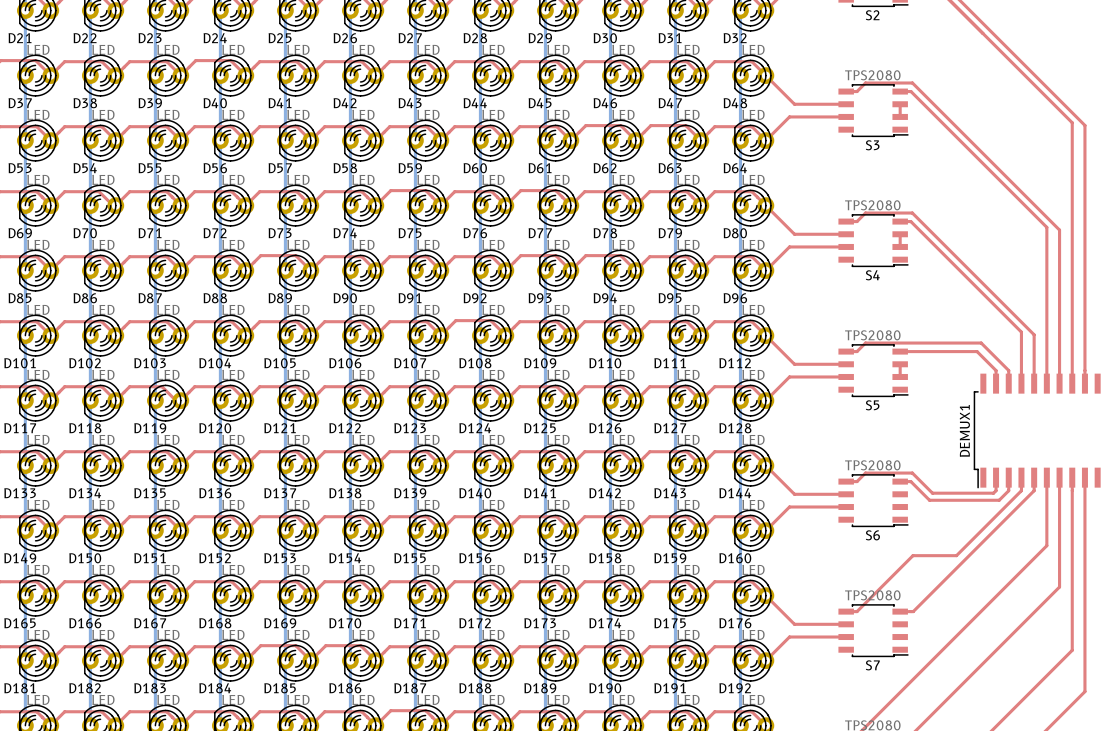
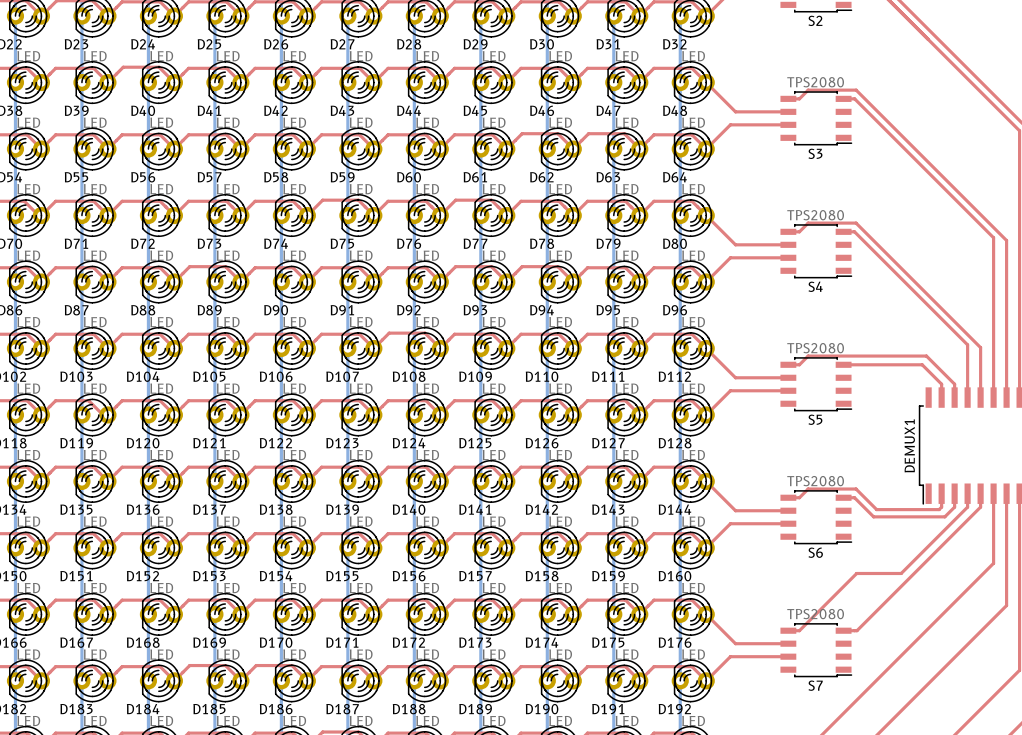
top track: (900, 104) (900, 116) -> none
top track: (900, 234) (900, 246) -> none
top track: (900, 364) (900, 376) -> none

